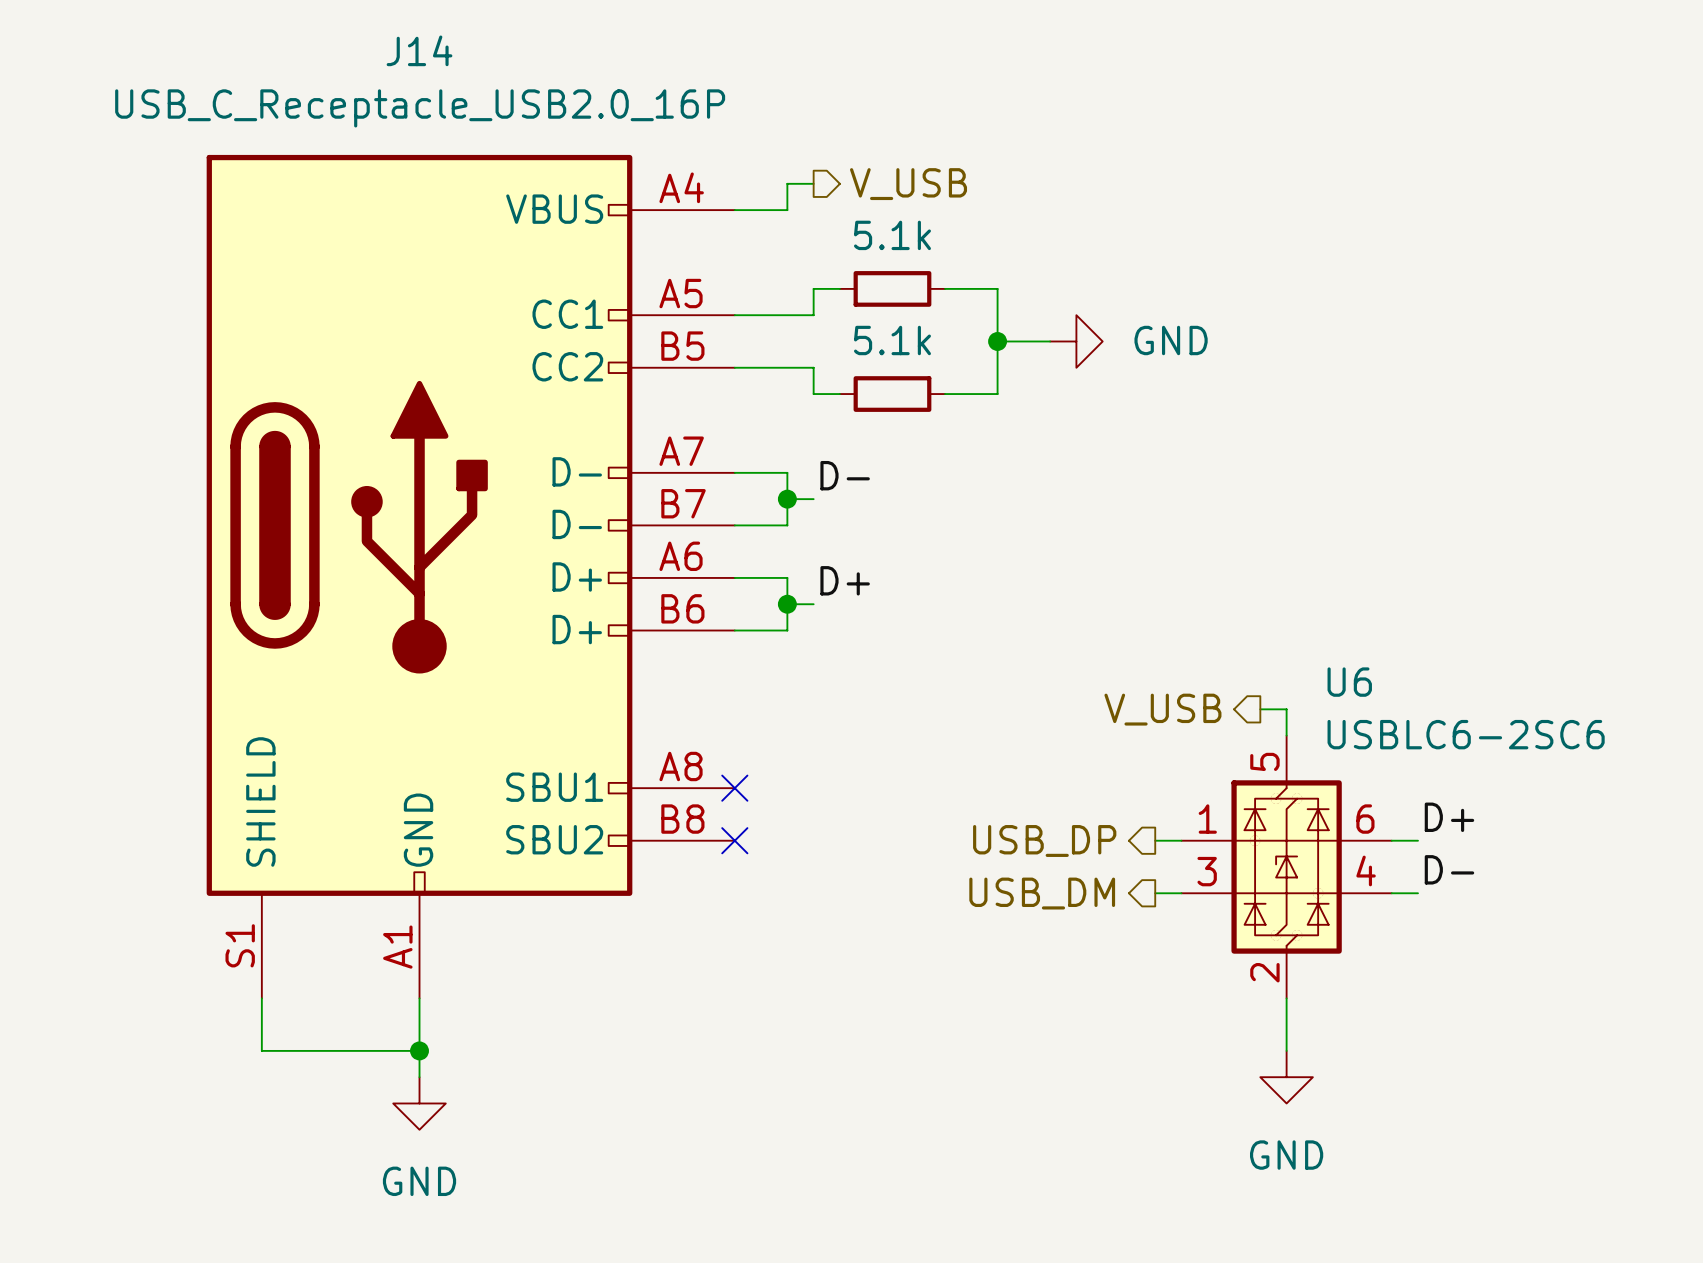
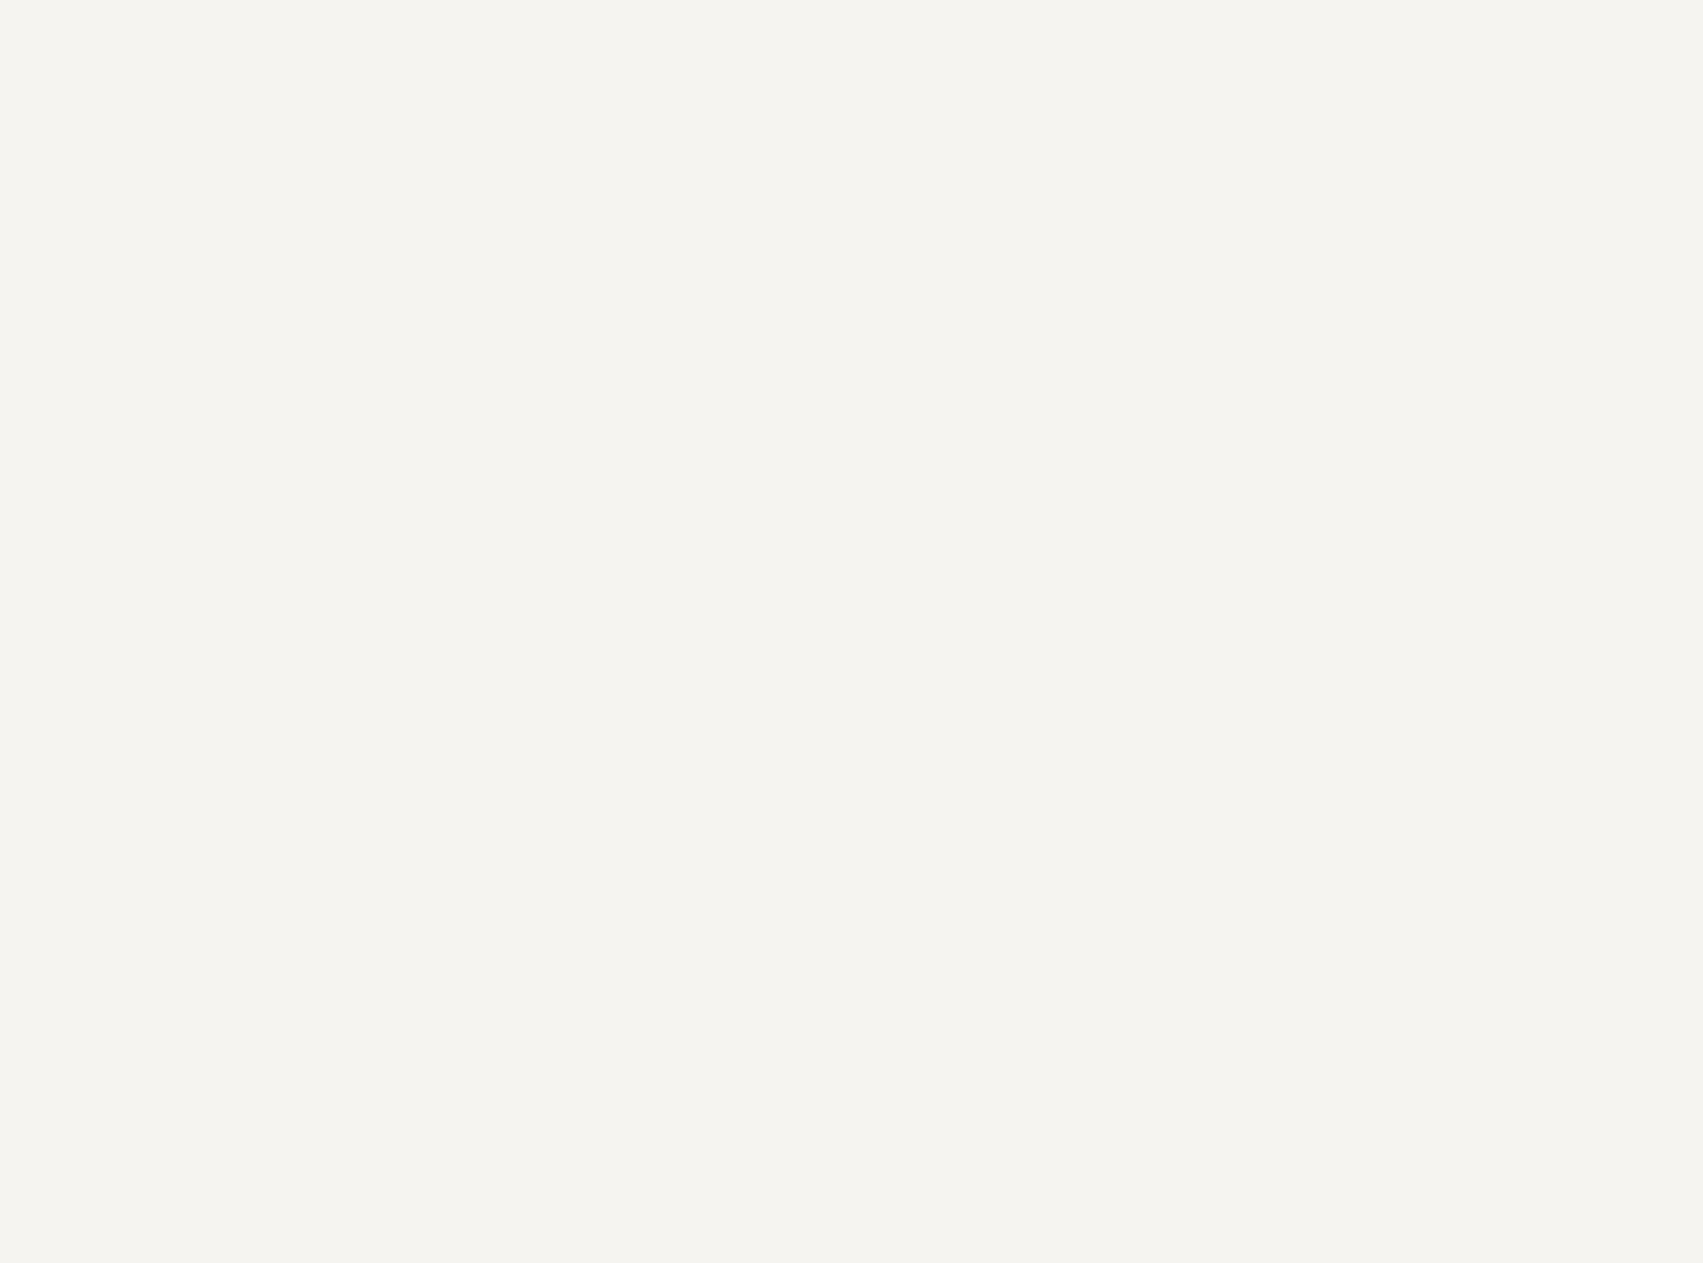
wire: (813, 183) (787, 183) (787, 210) (734, 210) -> none
hierarchical label: V_USB (908, 184) -> none
wire: (839, 288) (813, 288) (813, 315) (734, 315) -> none
part: 5.1k (892, 288) -> none
wire: (945, 288) (997, 288) (997, 394) (945, 394) -> none
wire: (997, 341) (1050, 341) -> none
junction: (997, 341) -> none
power symbol: GND (1076, 341) -> none
wire: (734, 367) (813, 367) (813, 394) (839, 394) -> none
part: 5.1k (892, 394) -> none
wire: (734, 472) (787, 472) (787, 525) (734, 525) -> none
label: D- (845, 475) -> none
wire: (787, 499) (813, 499) -> none
junction: (787, 499) -> none
J14: USB_C_Receptacle_USB2.0_16P (470, 576) -> none
wire: (734, 577) (787, 577) (787, 630) (734, 630) -> none
label: D+ (845, 580) -> none
wire: (787, 604) (813, 604) -> none
junction: (787, 604) -> none
hierarchical label: V_USB (1162, 709) -> none
wire: (1260, 709) (1286, 709) (1286, 735) -> none
no-connect mark: (734, 788) -> none
label: D+ (1449, 817) -> none
no-connect mark: (734, 840) -> none
hierarchical label: USB_DP (1044, 840) -> none
wire: (1155, 840) (1181, 840) -> none
wire: (1391, 840) (1417, 840) -> none
U6: USBLC6-2SC6 (1286, 866) -> none
label: D- (1449, 869) -> none
hierarchical label: USB_DM (1042, 893) -> none
wire: (1155, 893) (1181, 893) -> none
wire: (1391, 893) (1417, 893) -> none
wire: (261, 998) (261, 1050) (419, 1050) -> none
wire: (419, 998) (419, 1077) -> none
wire: (1286, 998) (1286, 1050) -> none
junction: (419, 1050) -> none
power symbol: GND (1286, 1077) -> none
power symbol: GND (419, 1103) -> none

